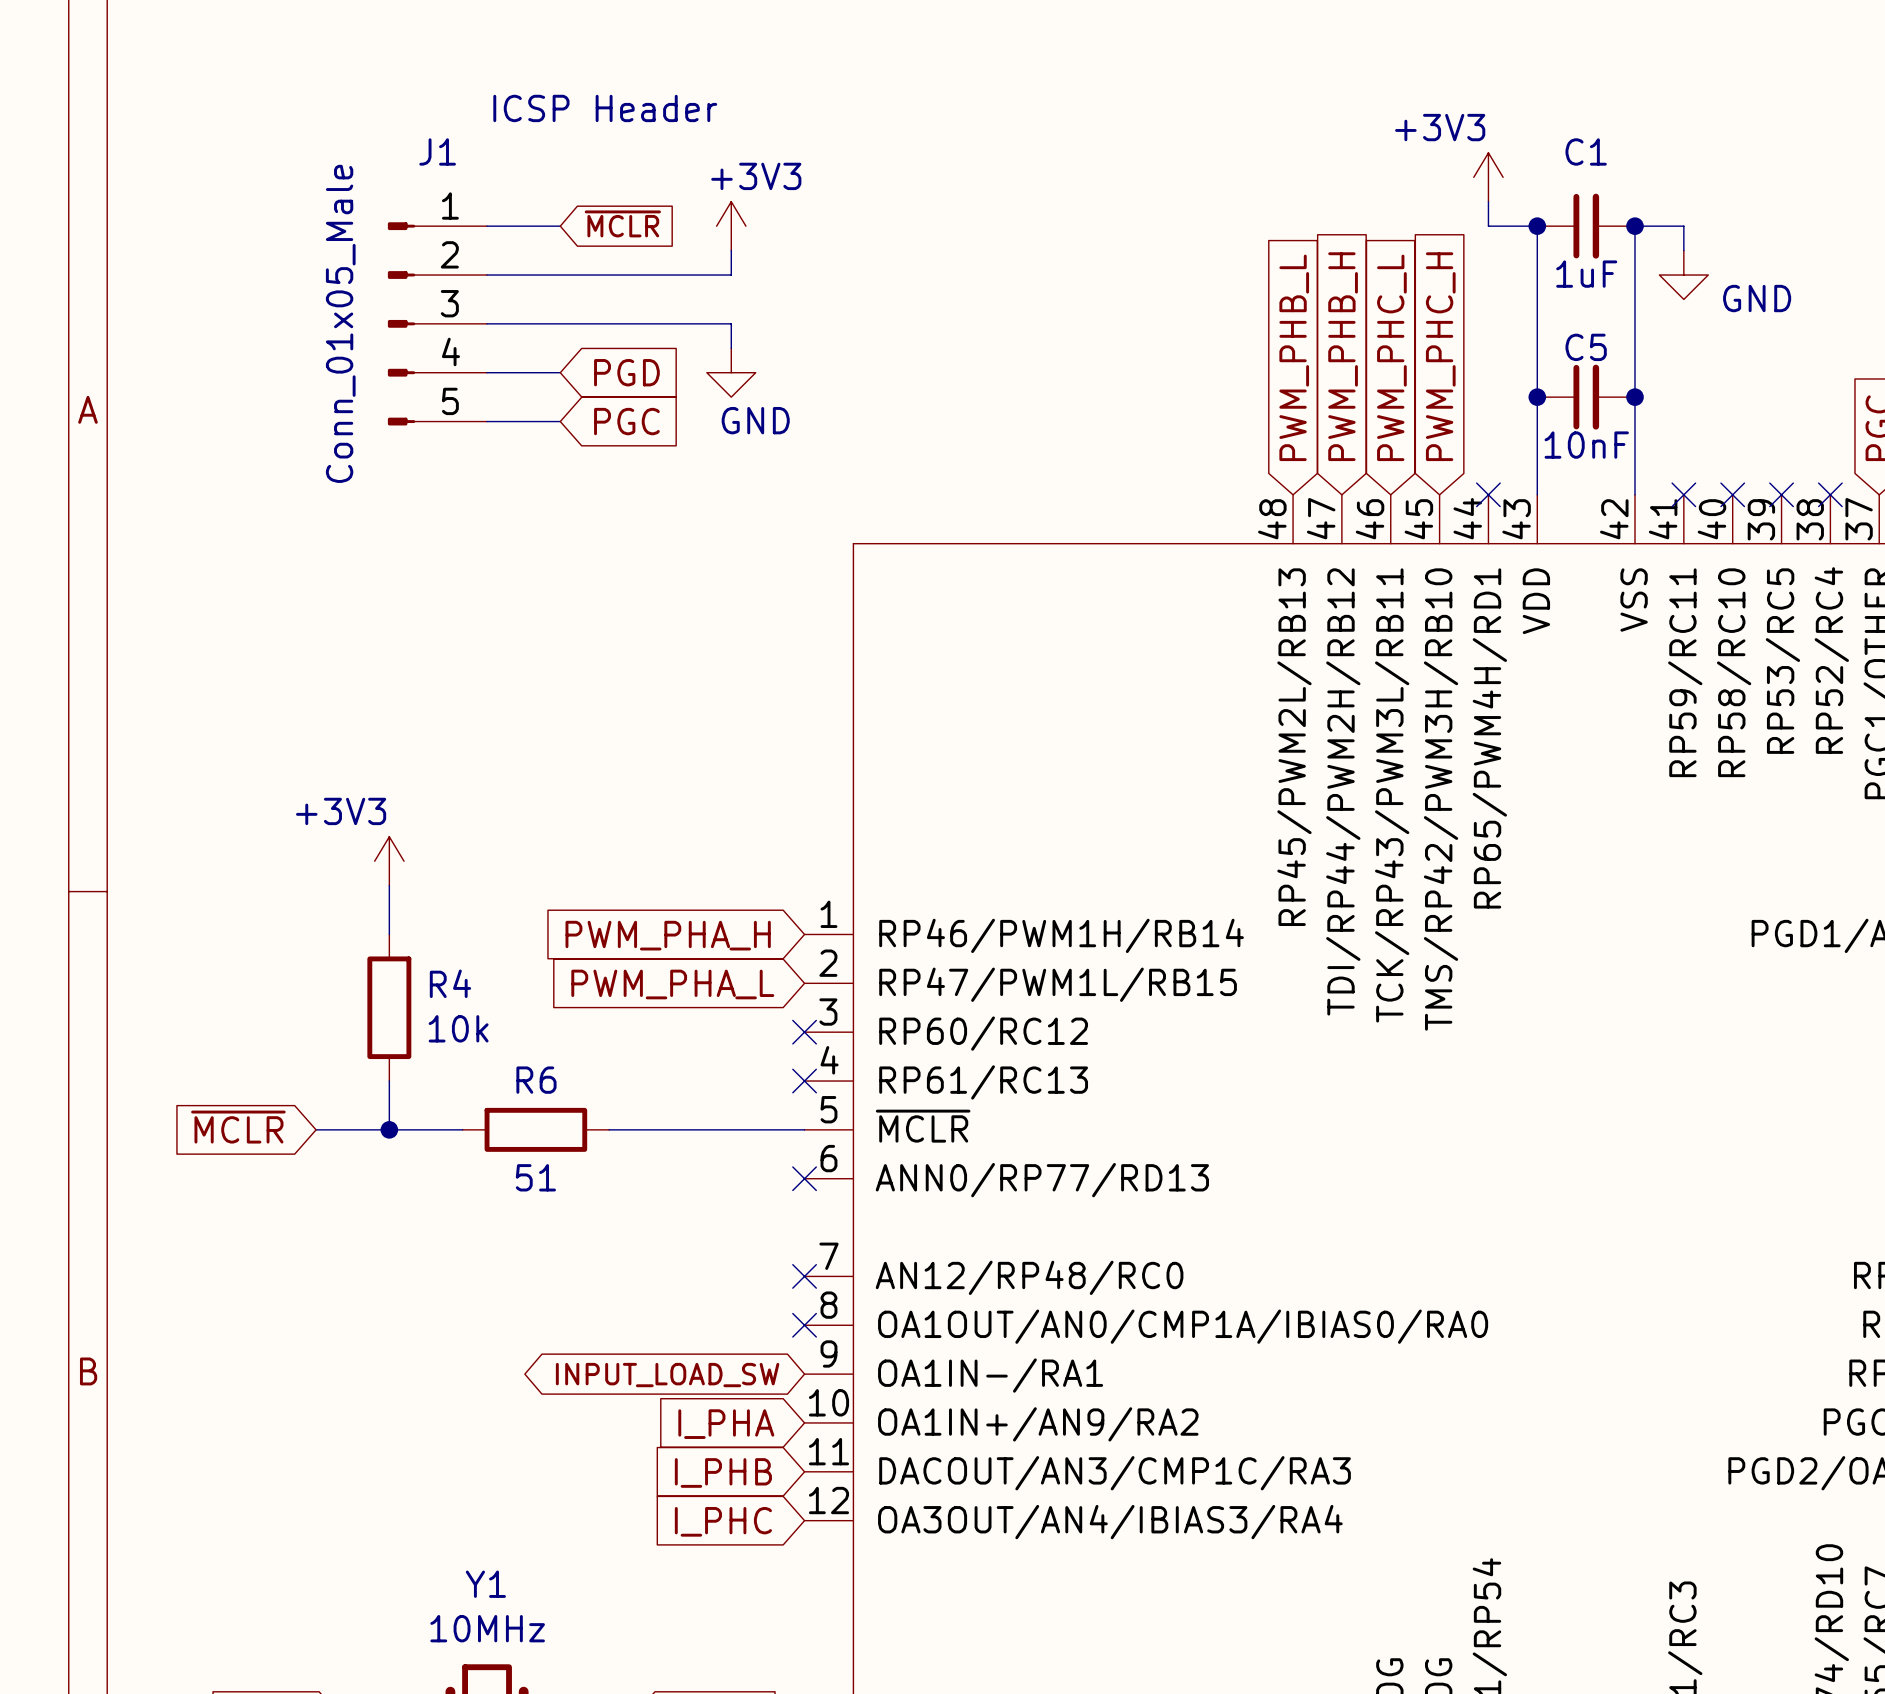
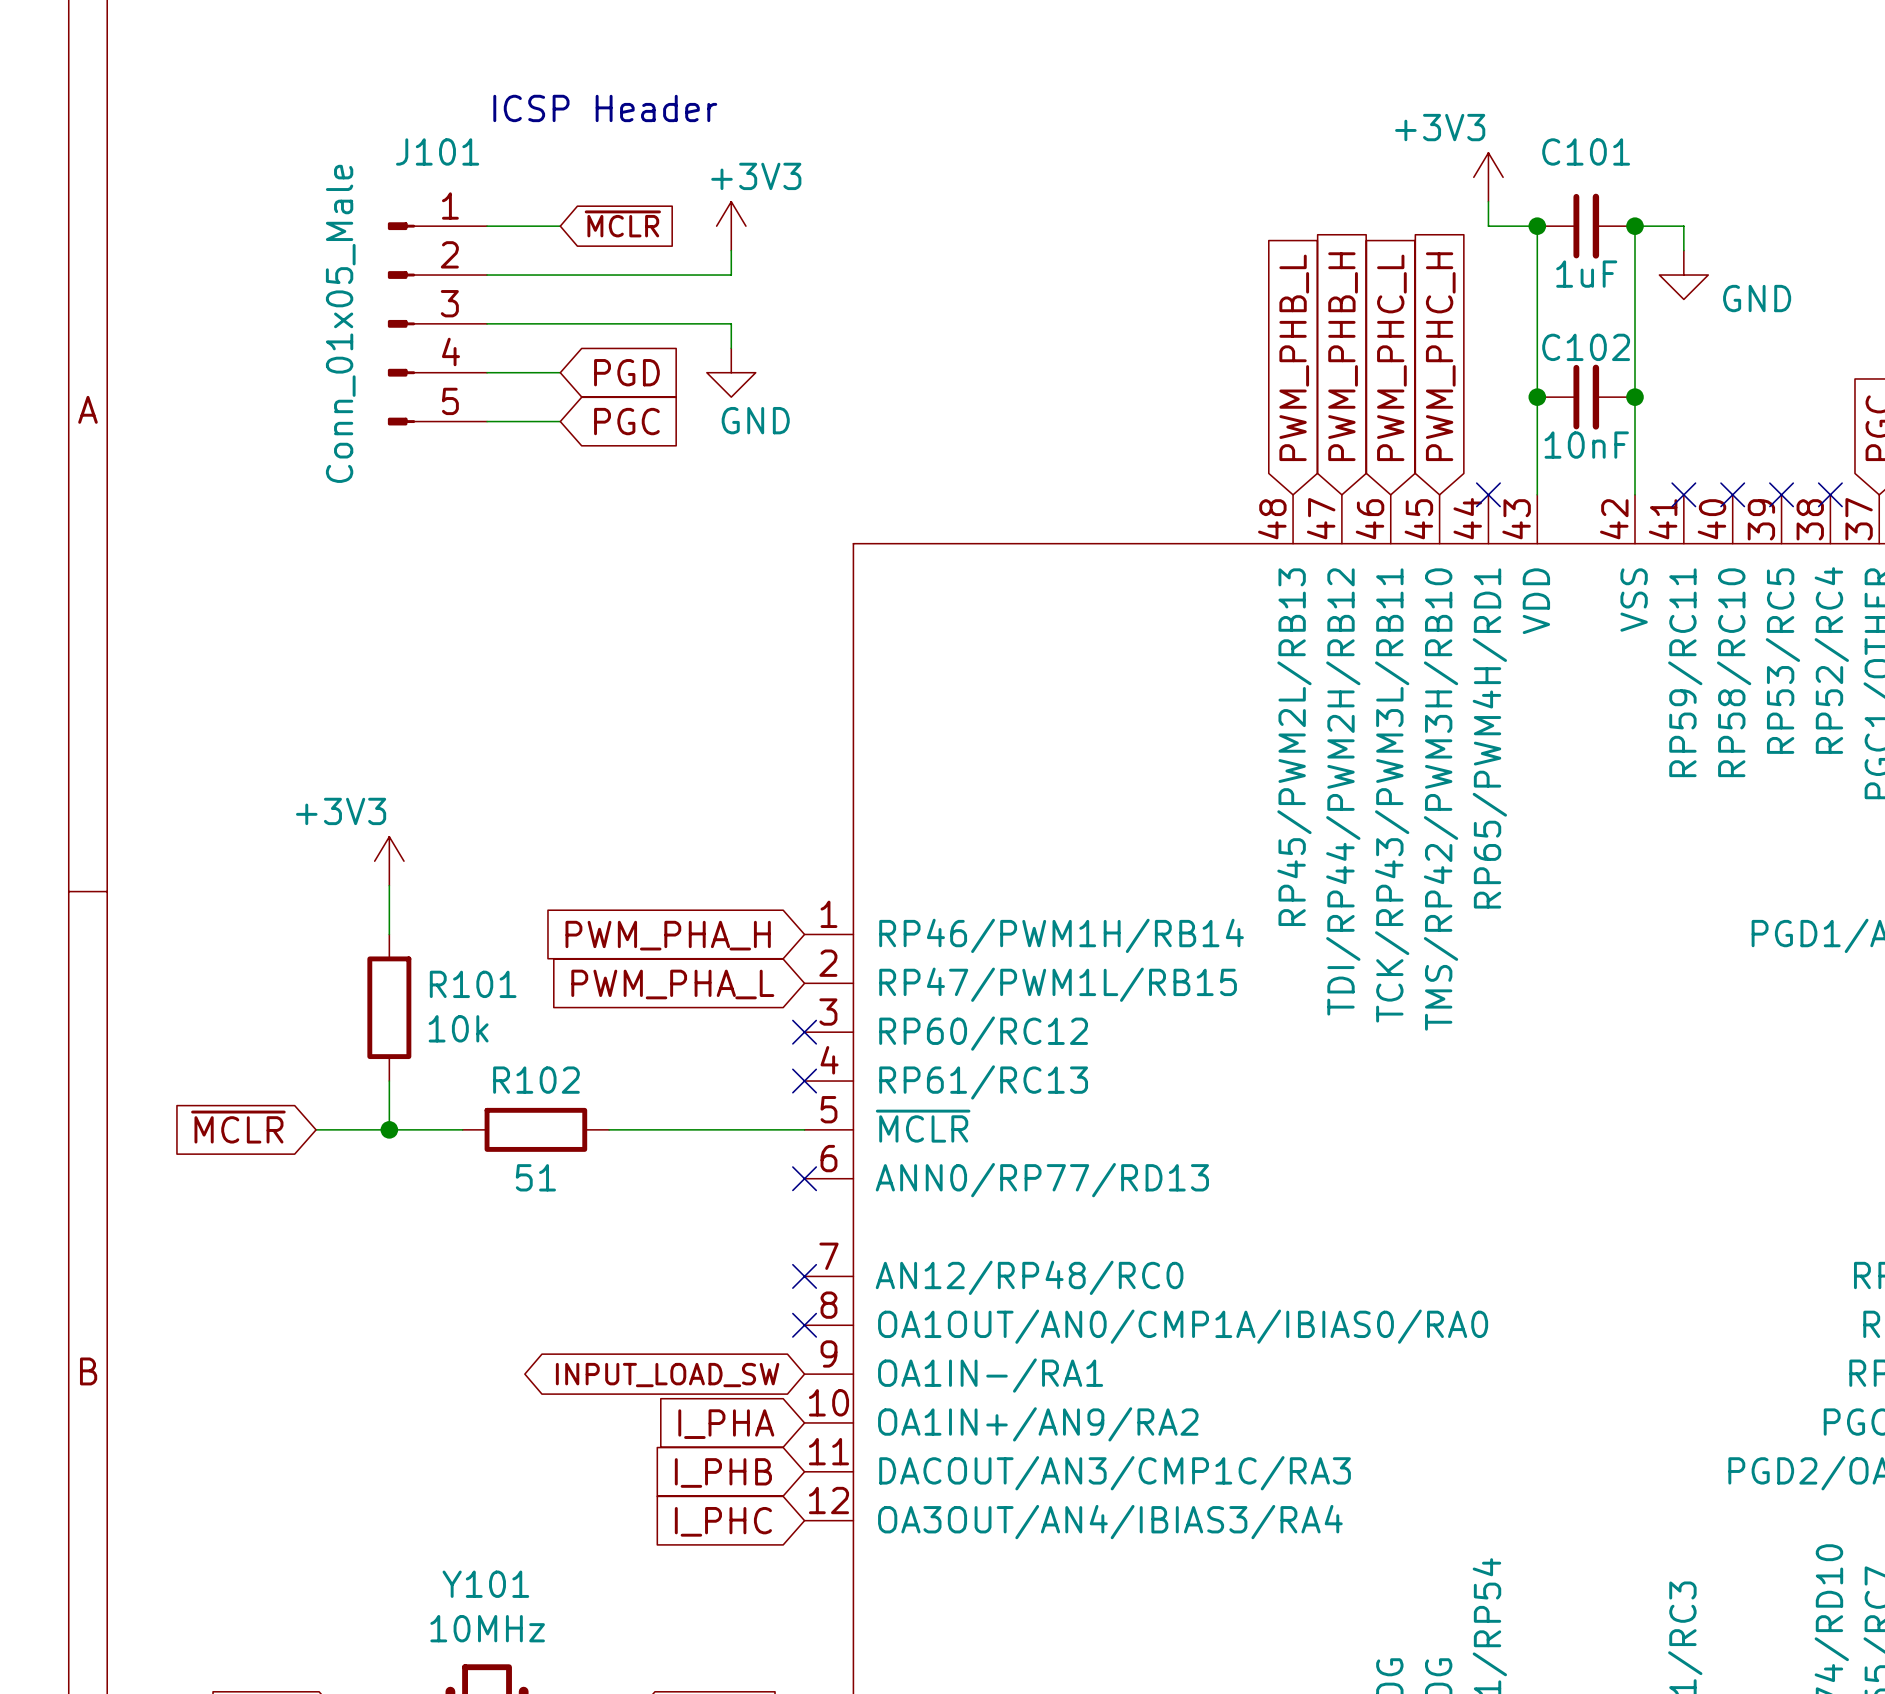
J1 name: J1 (437, 151) -> J101 (437, 151)
C1 name: C1 (1586, 151) -> C101 (1586, 151)
C5 name: C5 (1586, 347) -> C102 (1586, 347)
R4 name: R4 (450, 983) -> R101 (473, 984)
R6 name: R6 (536, 1080) -> R102 (536, 1080)
Y1 name: Y1 (485, 1584) -> Y101 (485, 1584)

